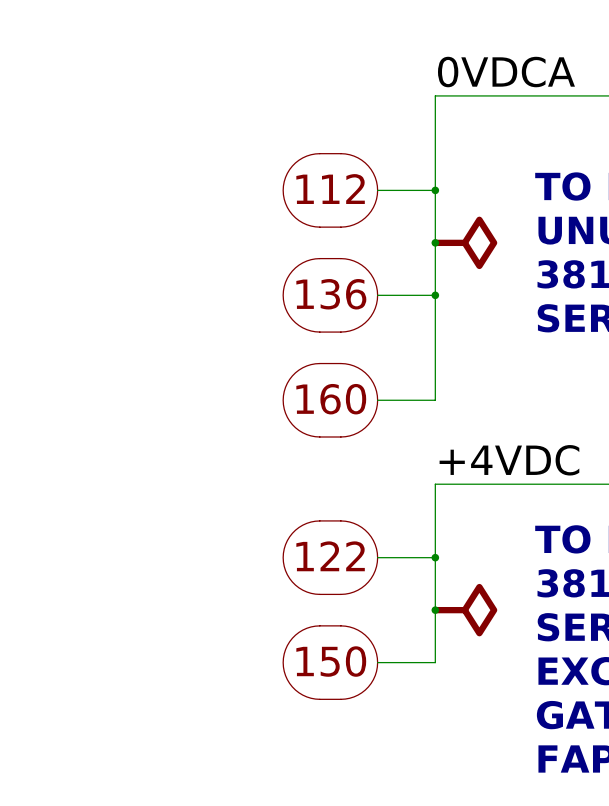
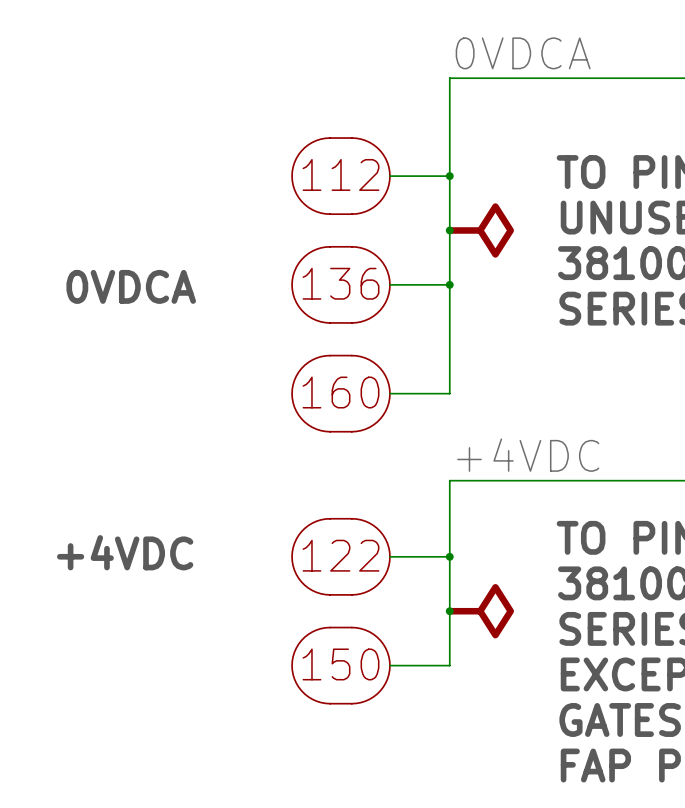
text: none -> 0VDCA (131, 286)
text: none -> +4VDC (125, 552)

